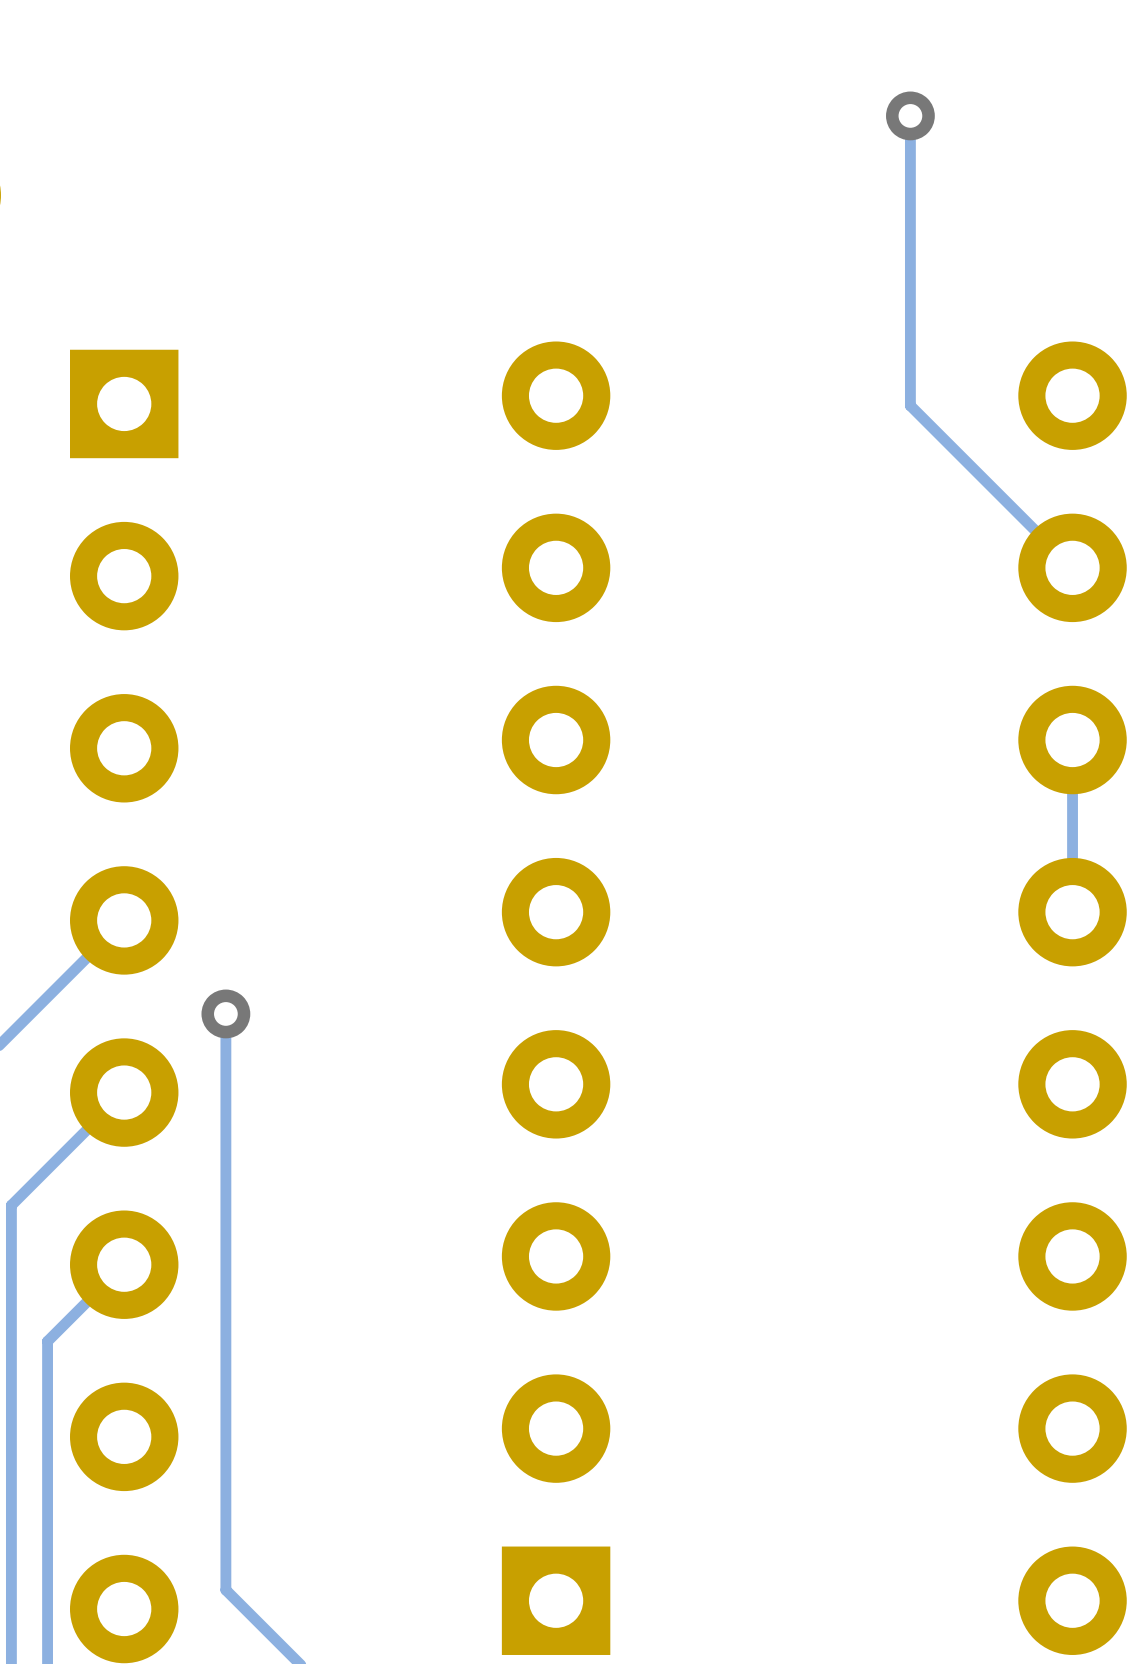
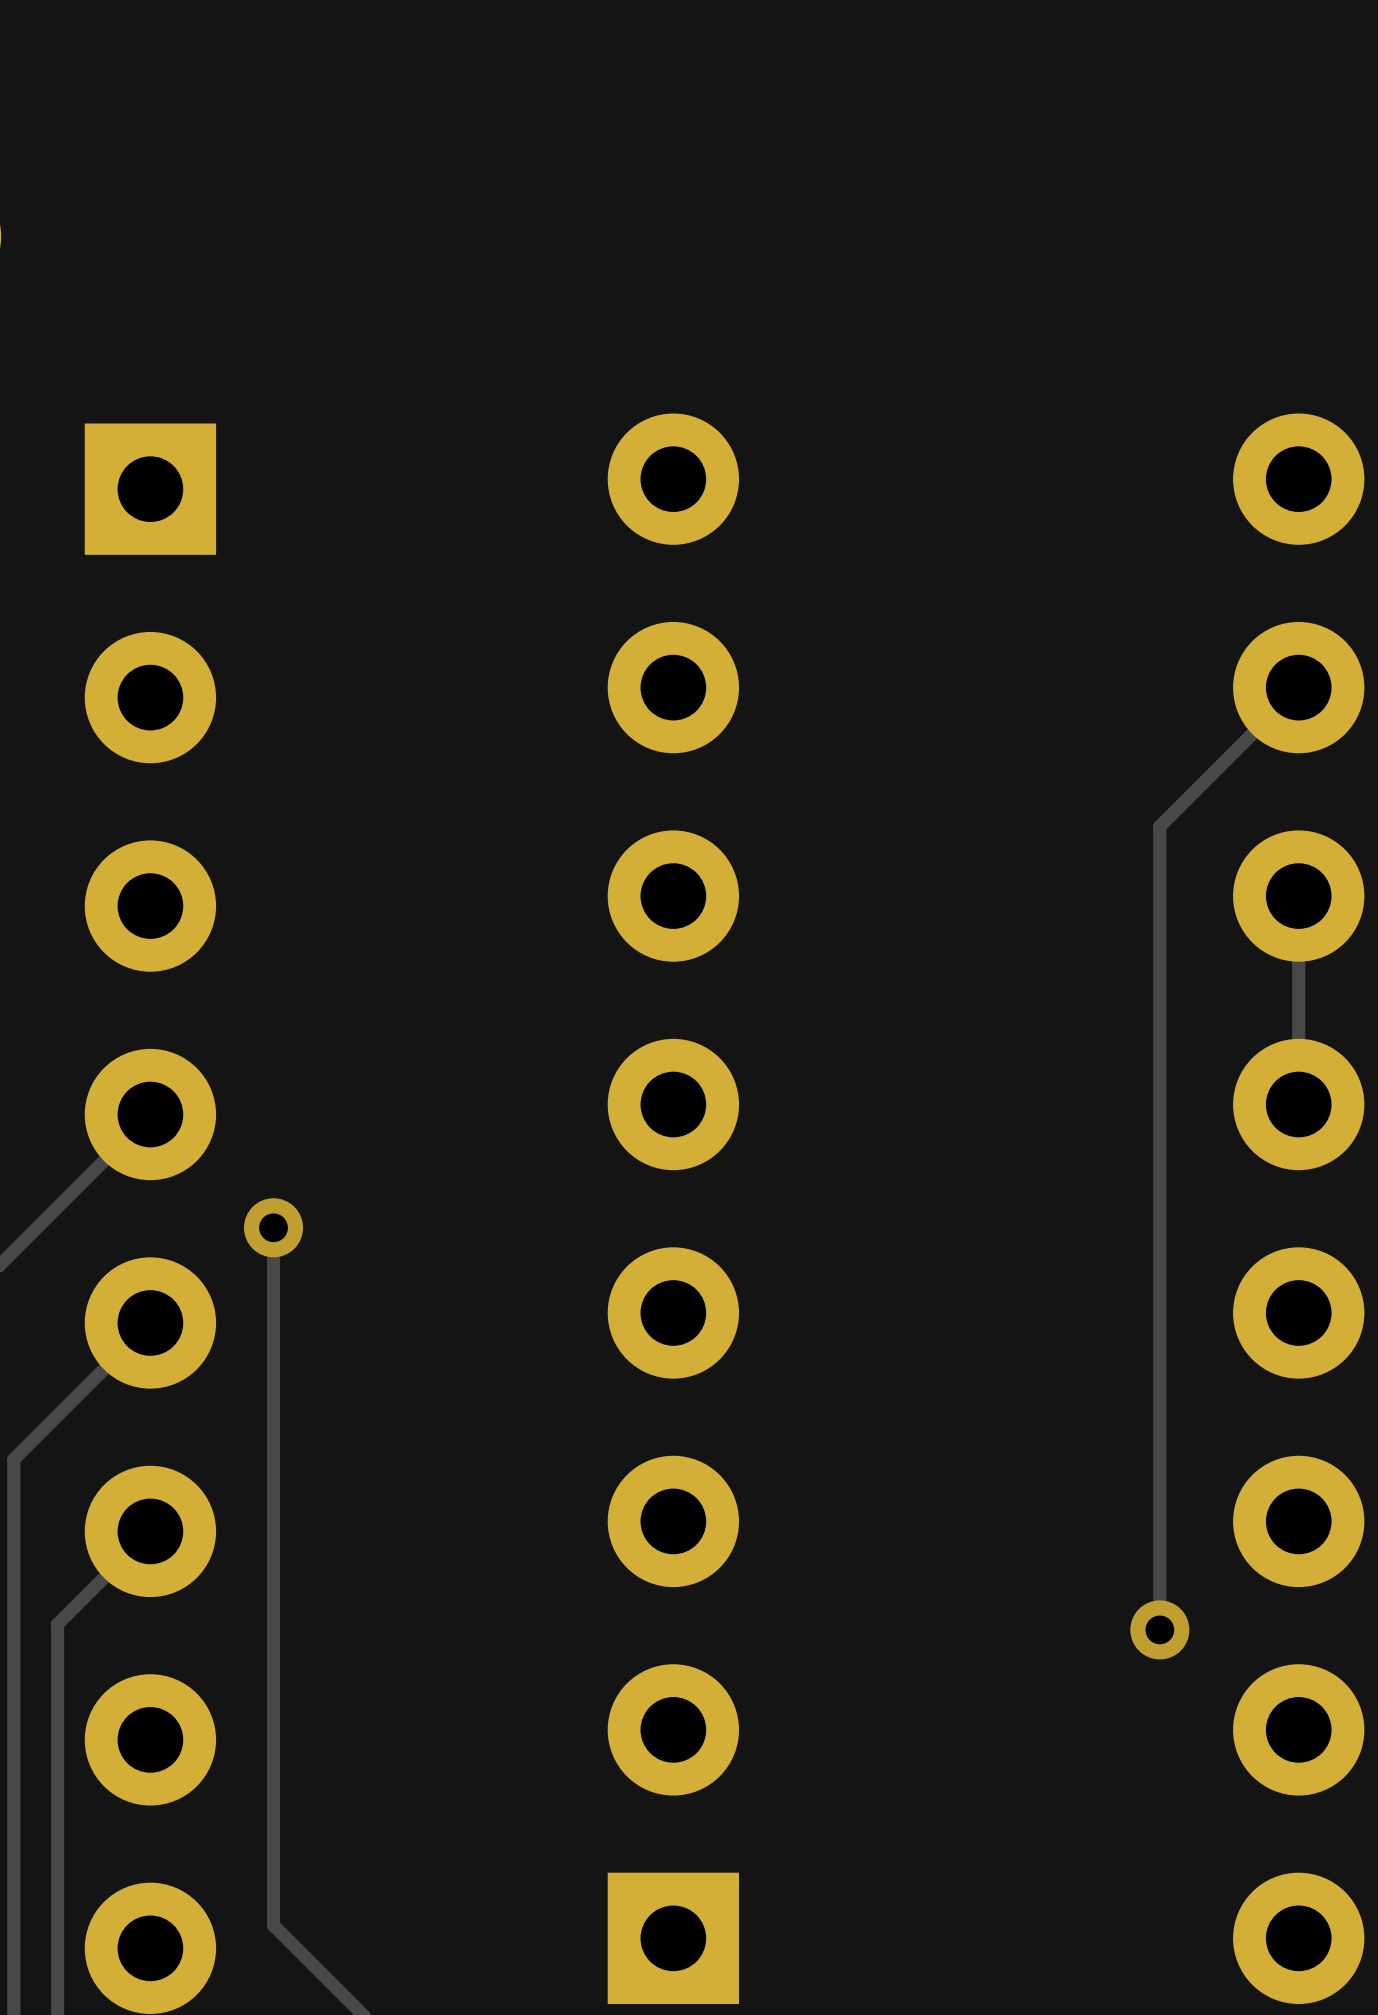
track: (910, 115) (910, 405) (1072, 567) -> (1159, 1629) (1159, 826) (1298, 687)
via: (910, 115) -> none
via: none -> (1159, 1629)

